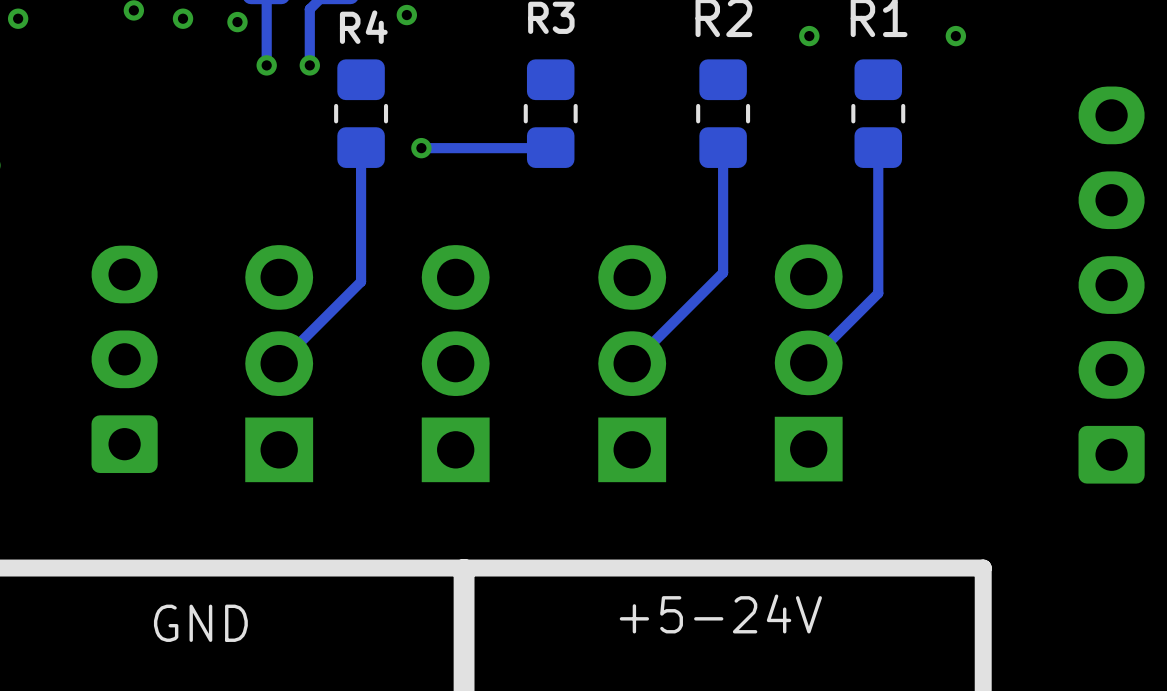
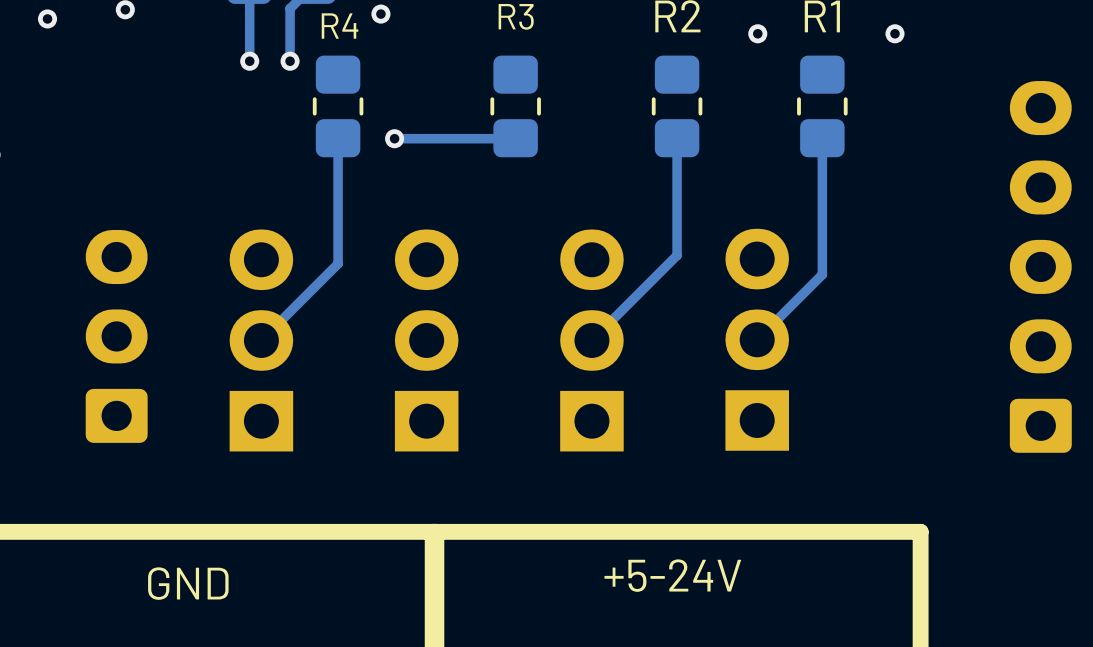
via: (18, 18) -> none
via: (183, 18) -> none
via: none -> (47, 18)
via: (237, 22) -> none

